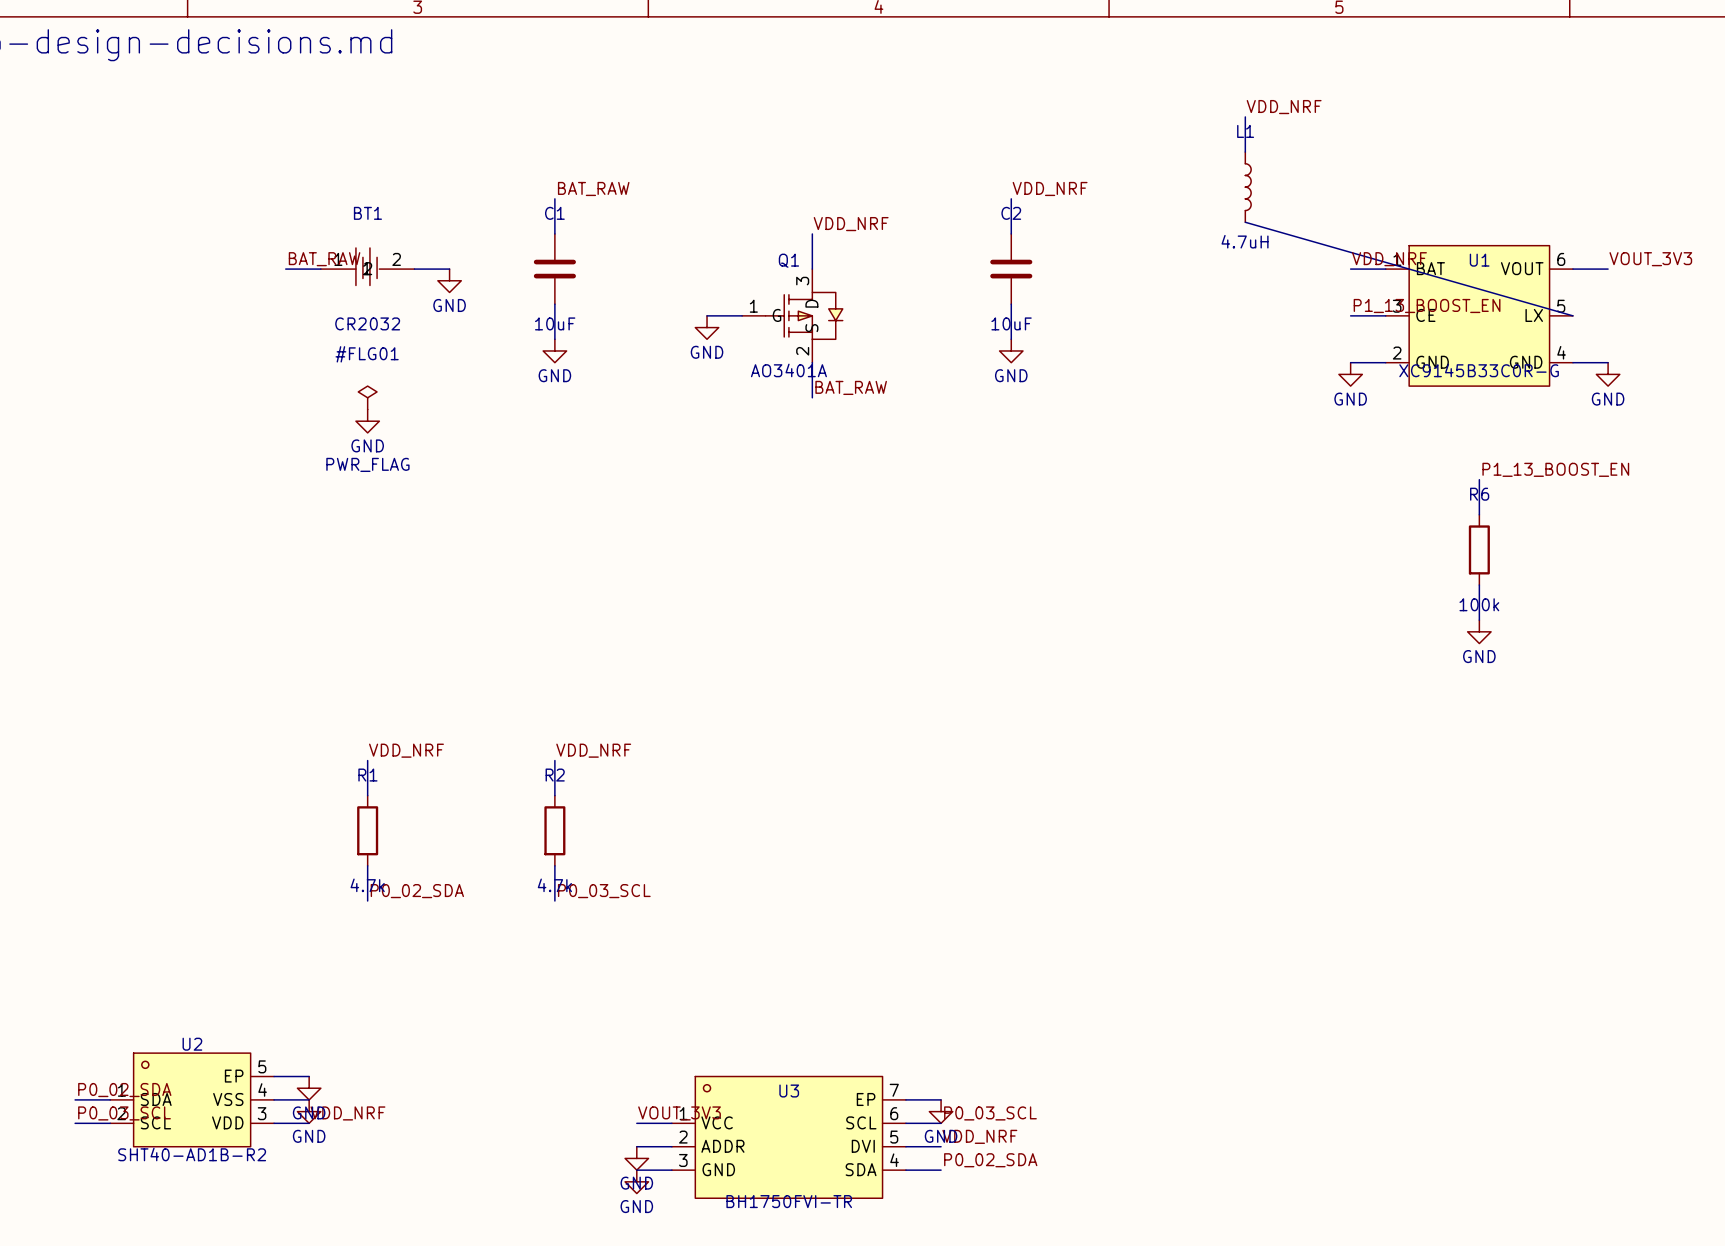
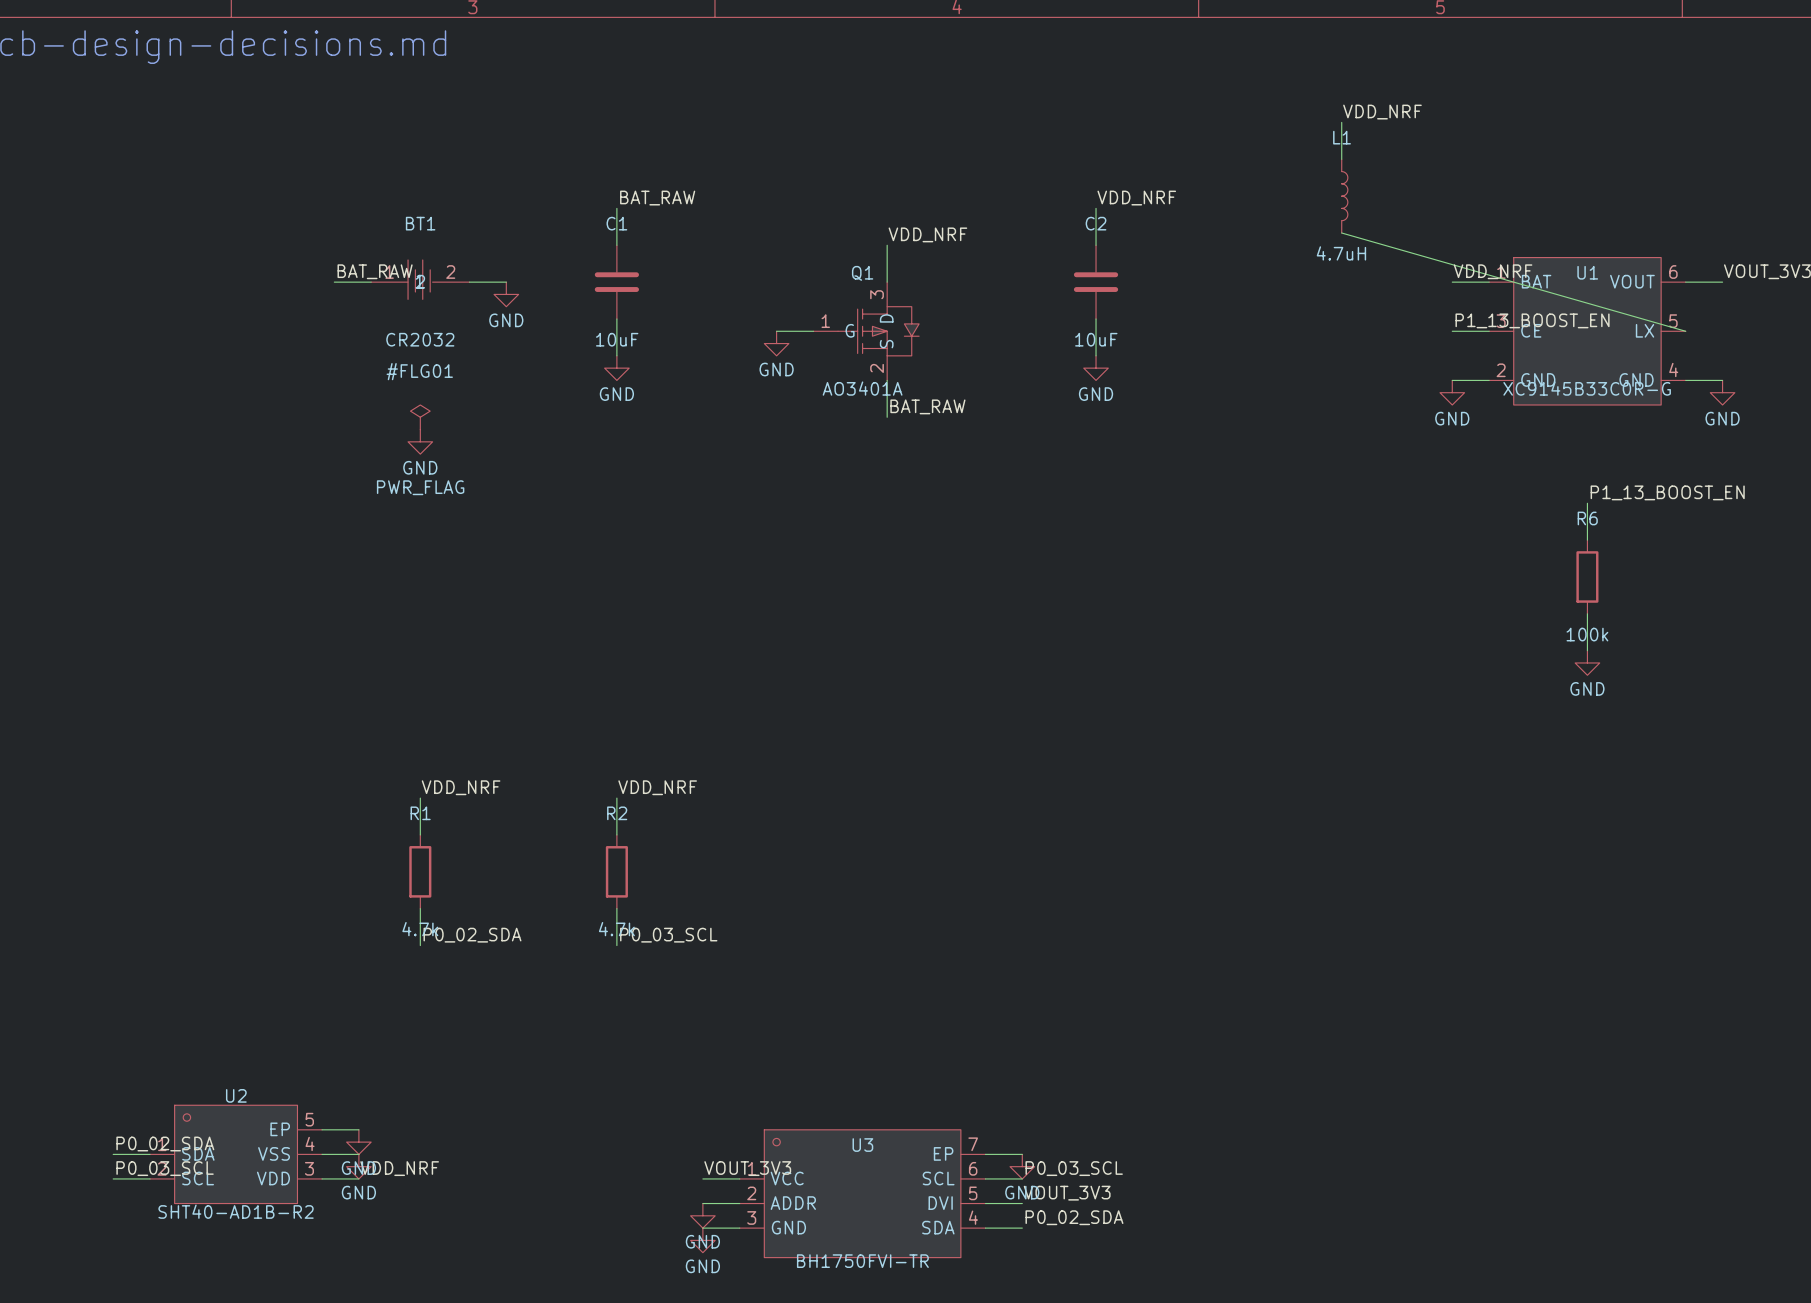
label: VDD_NRF (979, 1136) -> VOUT_3V3 (1067, 1193)

